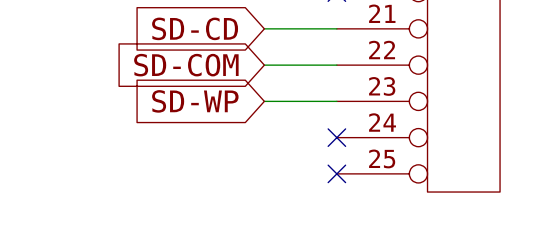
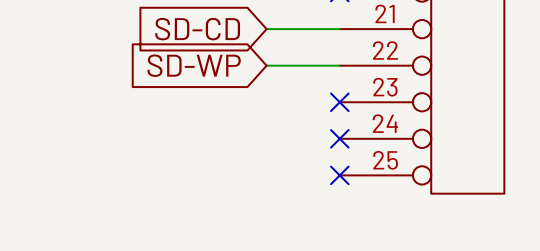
global label: SD-COM (186, 65) -> SD-WP (194, 65)
global label: SD-WP (195, 101) -> none
wire: (264, 101) (336, 101) -> none
no-connect mark: none -> (339, 102)

